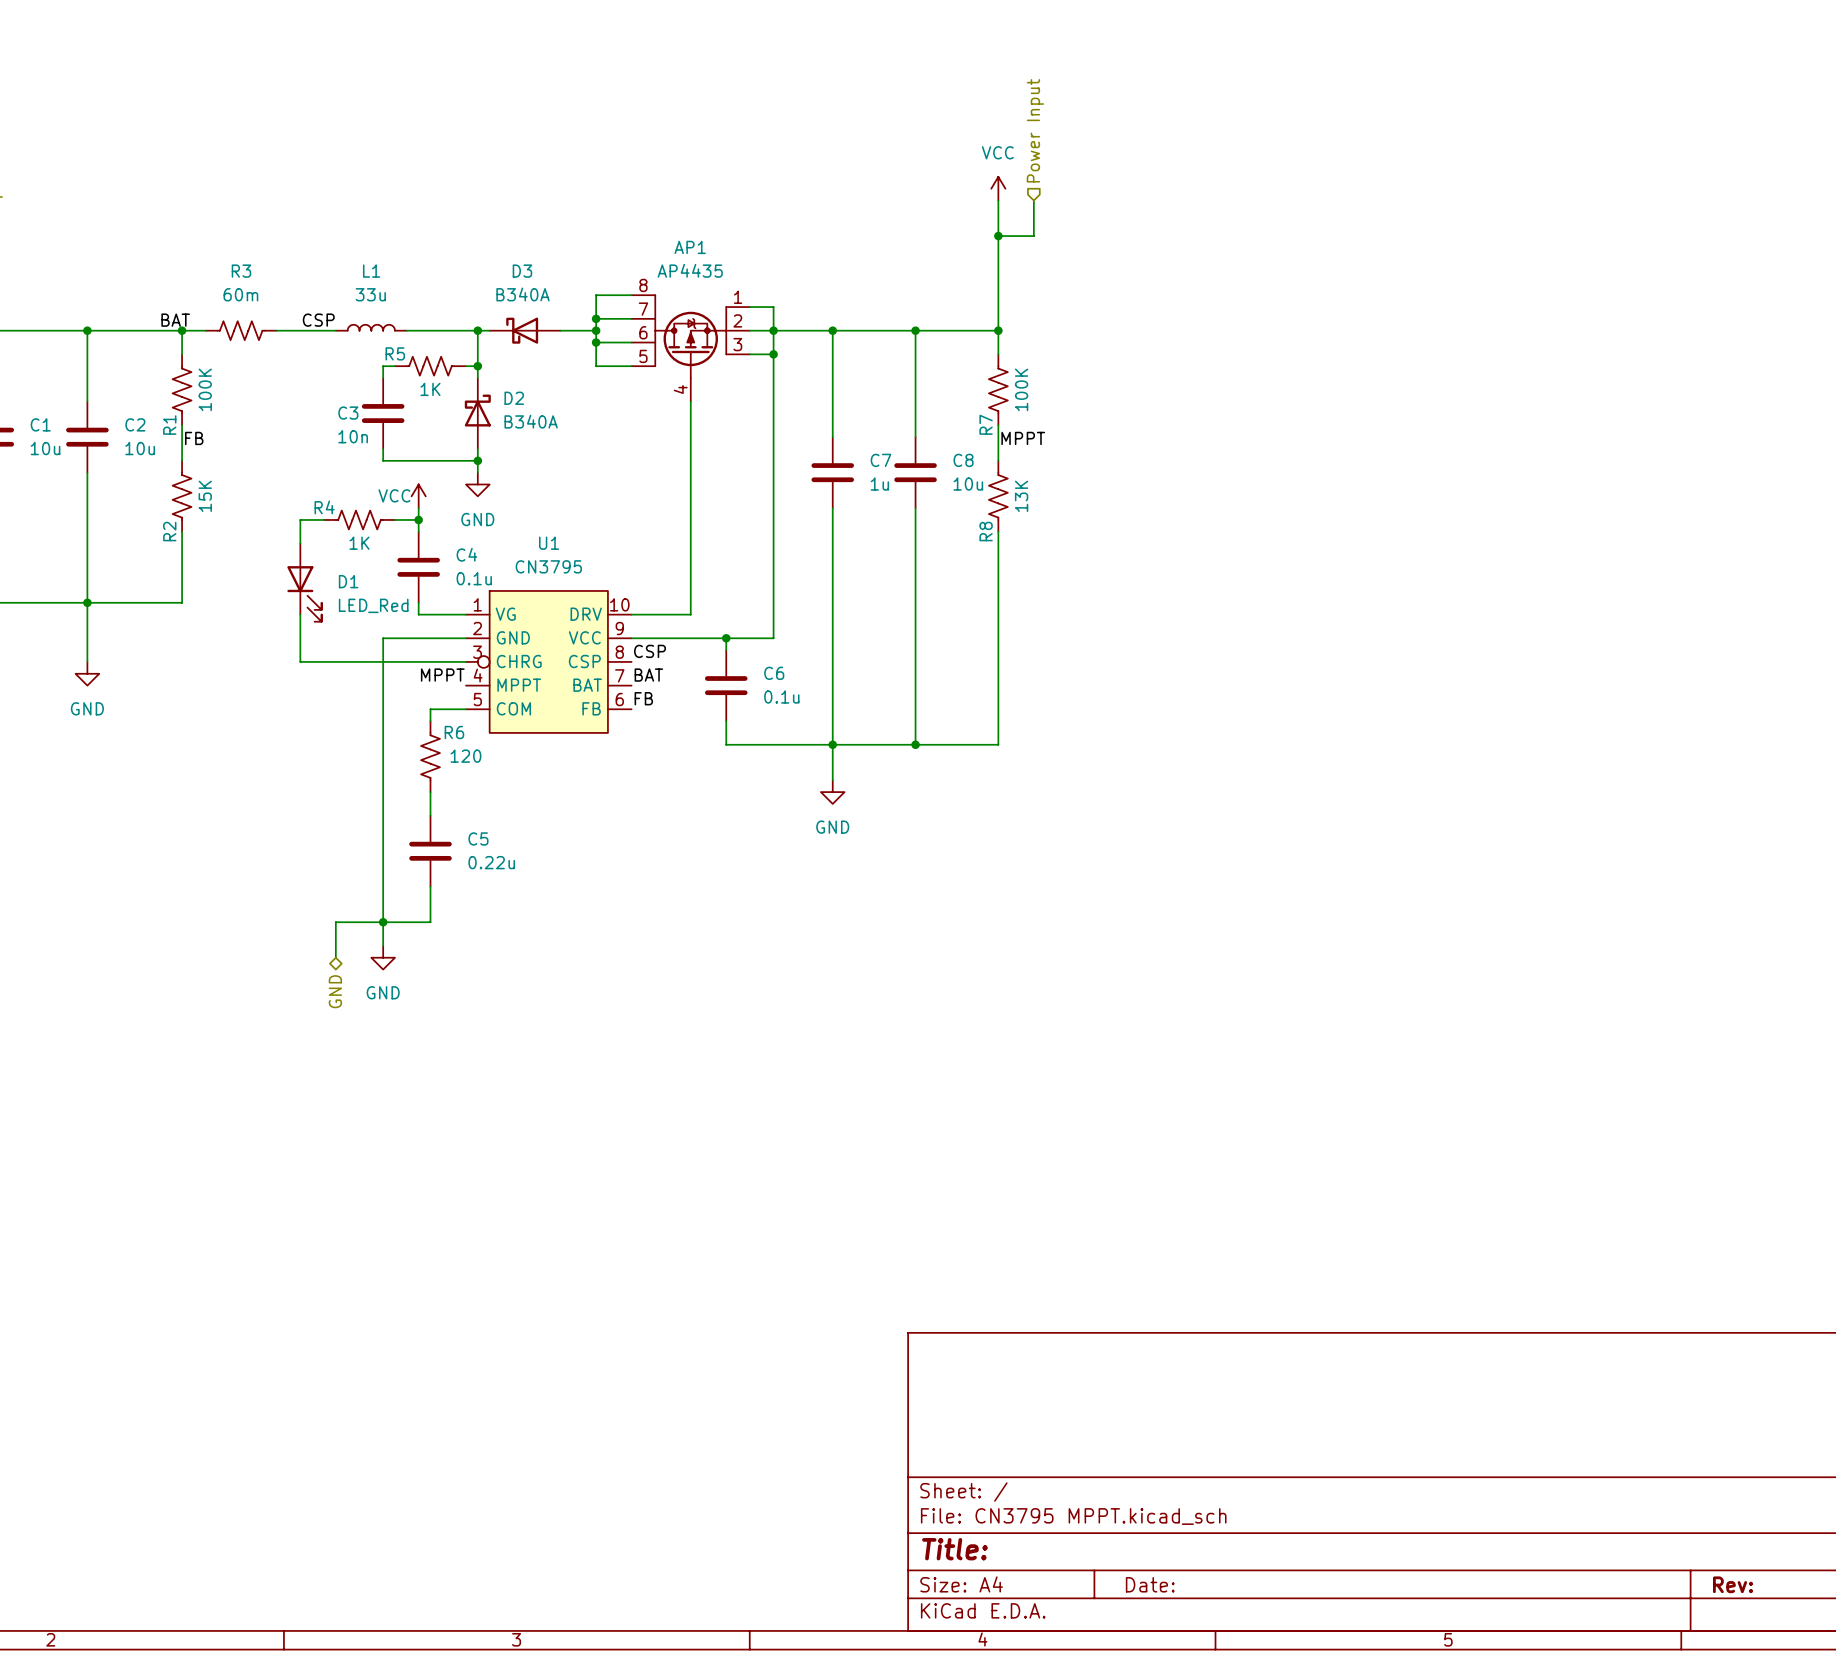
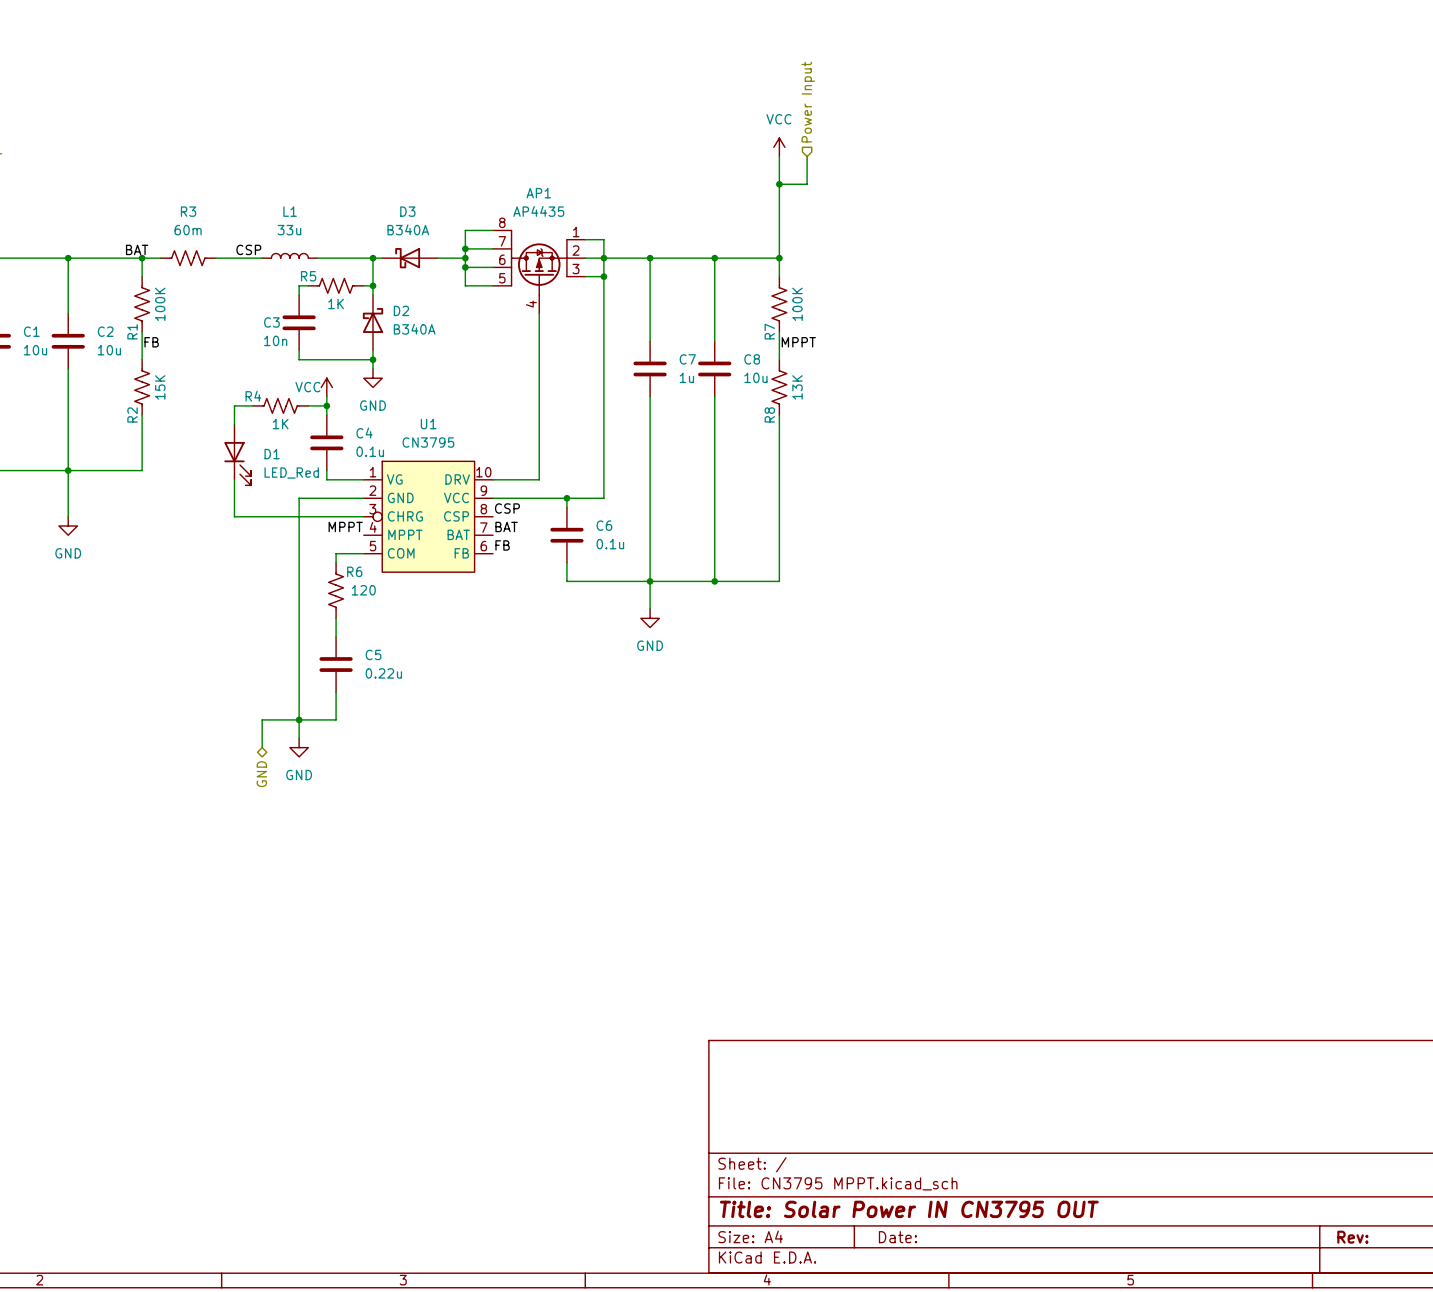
title block: Title: (954, 1549) -> Title: Solar Power IN CN3795 OUT (909, 1209)

